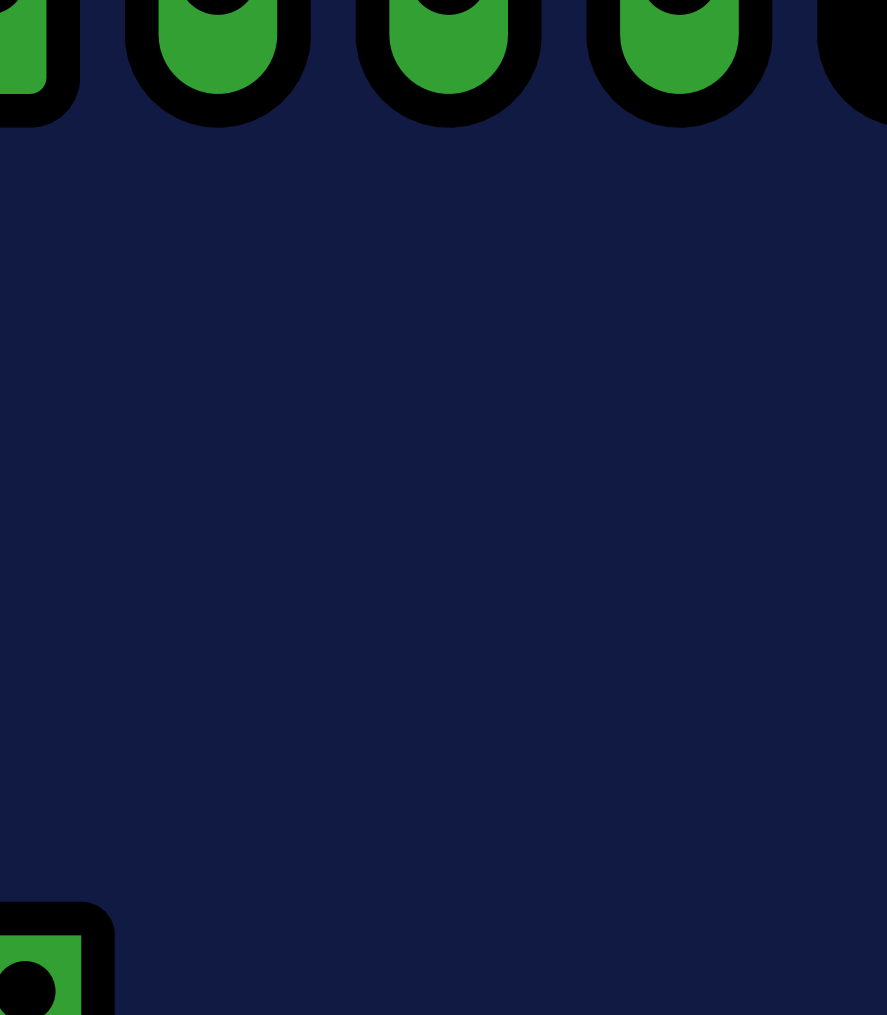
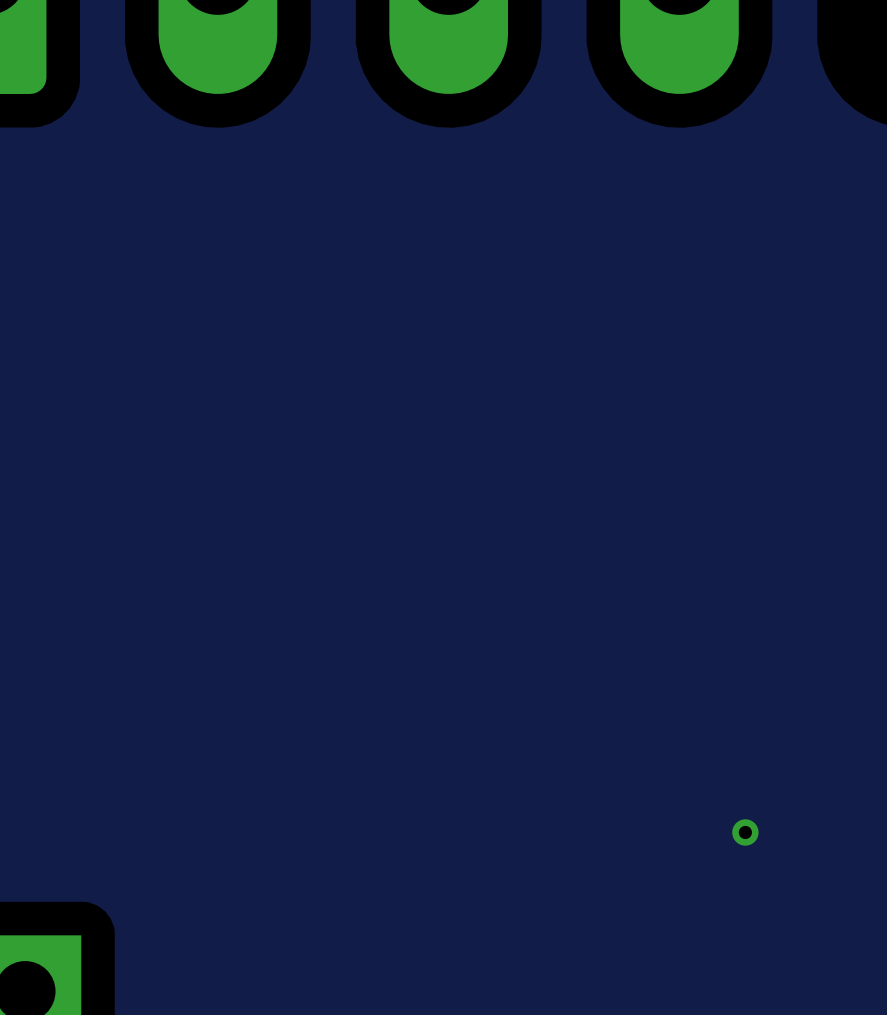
via: none -> (745, 832)

